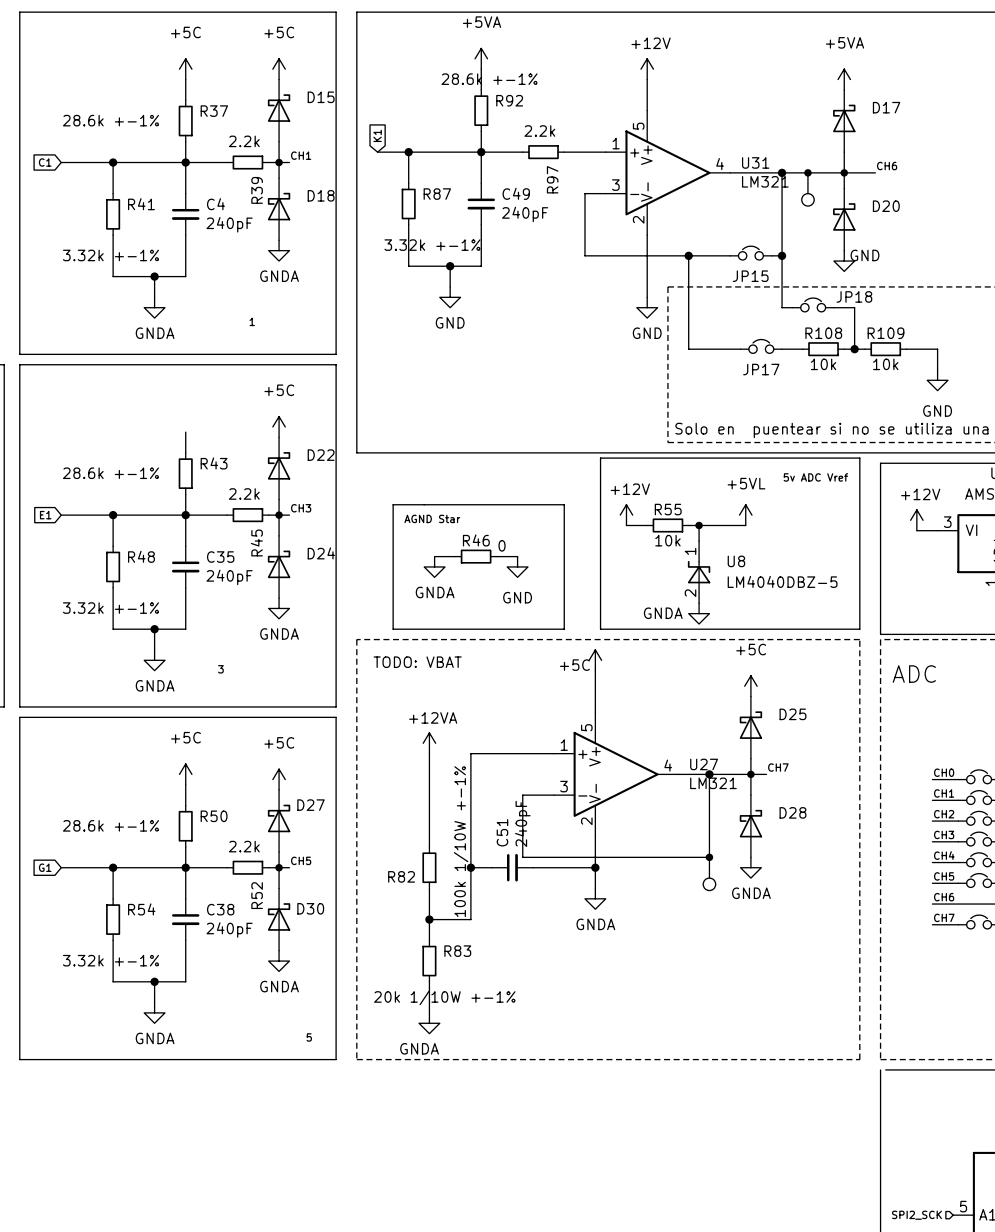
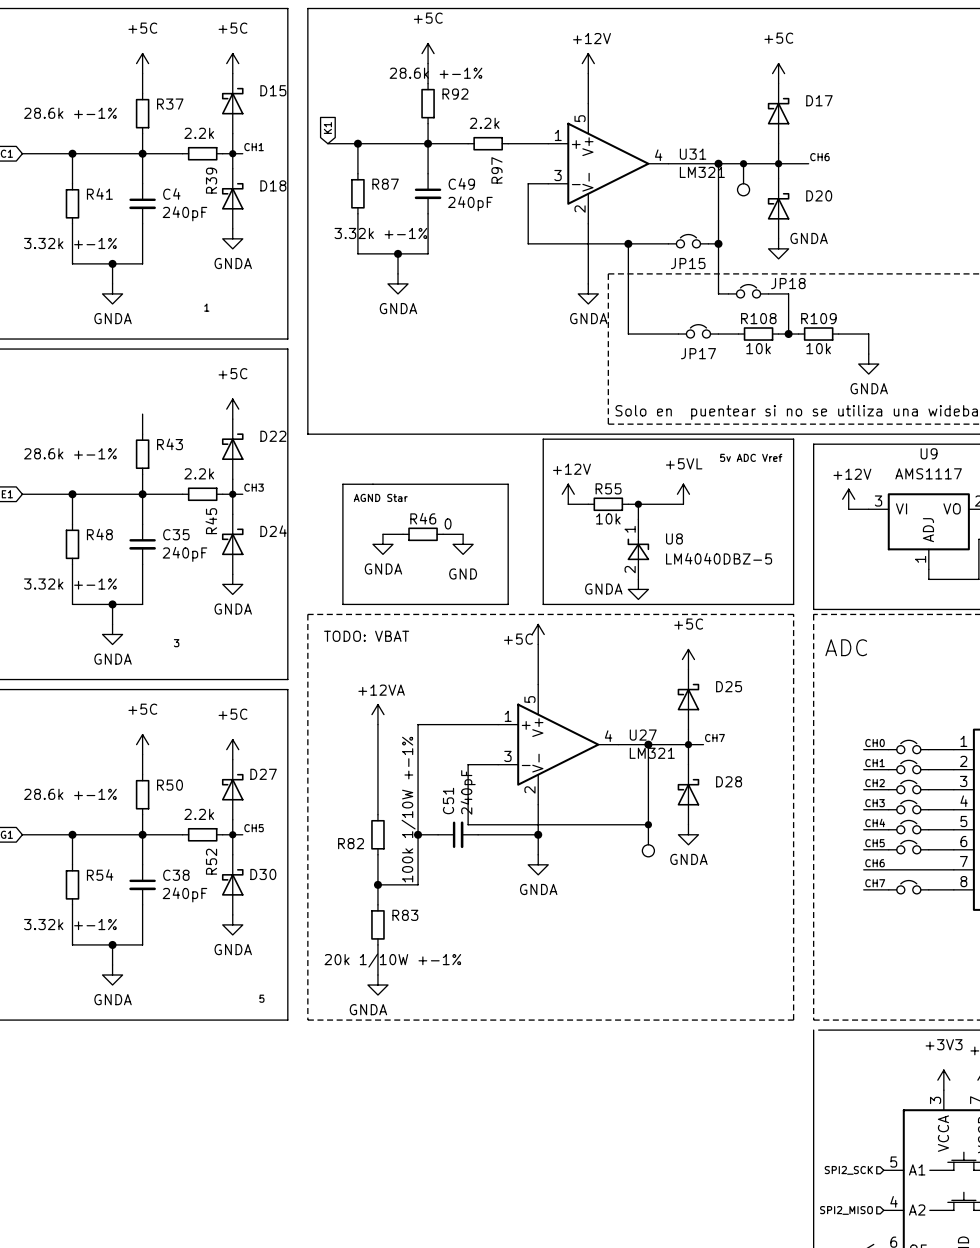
power symbol: +5VA (481, 58) -> +5C (428, 53)
power symbol: +5VA (844, 79) -> +5C (778, 73)
power symbol: GND (844, 261) -> GNDA (778, 248)
power symbol: GND (450, 297) -> GNDA (398, 283)
power symbol: GND (647, 307) -> GNDA (588, 293)
power symbol: GND (937, 380) -> GNDA (868, 364)

